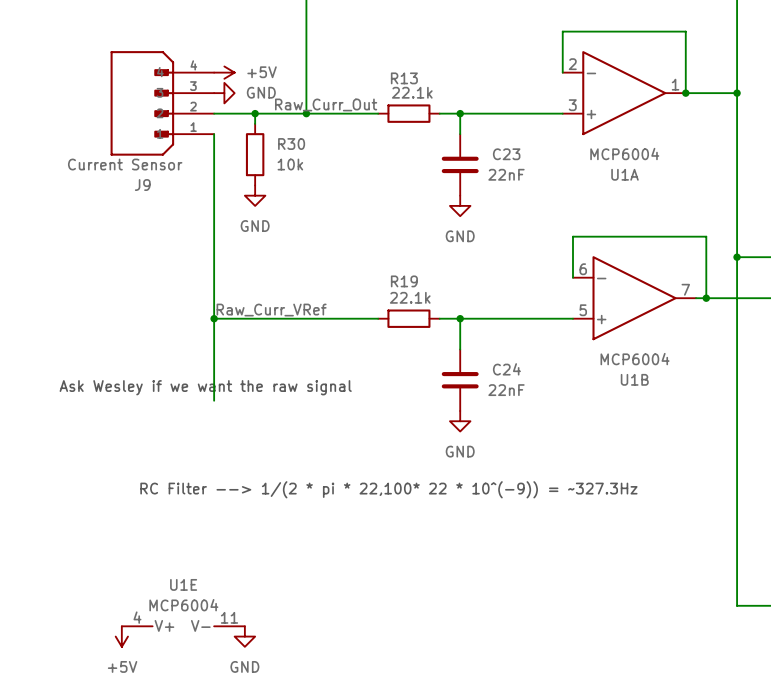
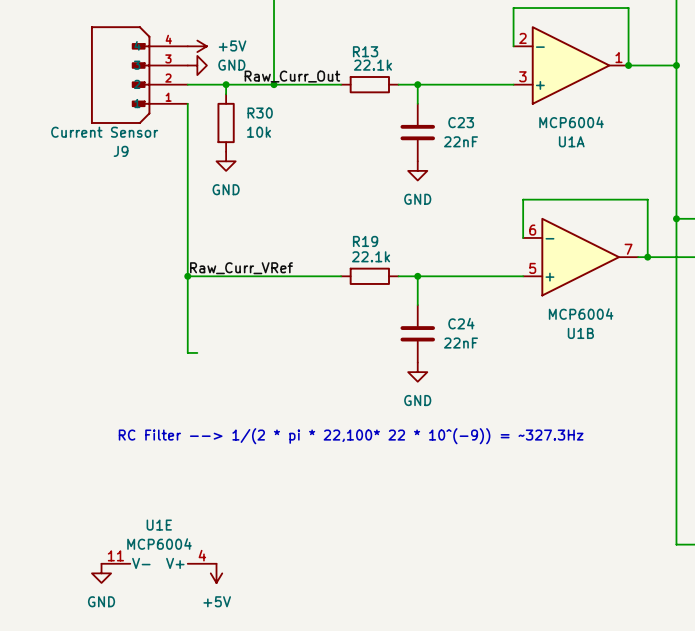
text: Ask Wesley if we want the raw signal (205, 387) -> none
wire: none -> (187, 352) (197, 352)
U1E rotation: 0° (183, 626) -> 180° (159, 563)
power symbol: +5V (121, 636) -> GND (101, 573)
power symbol: GND (244, 636) -> +5V (216, 573)

